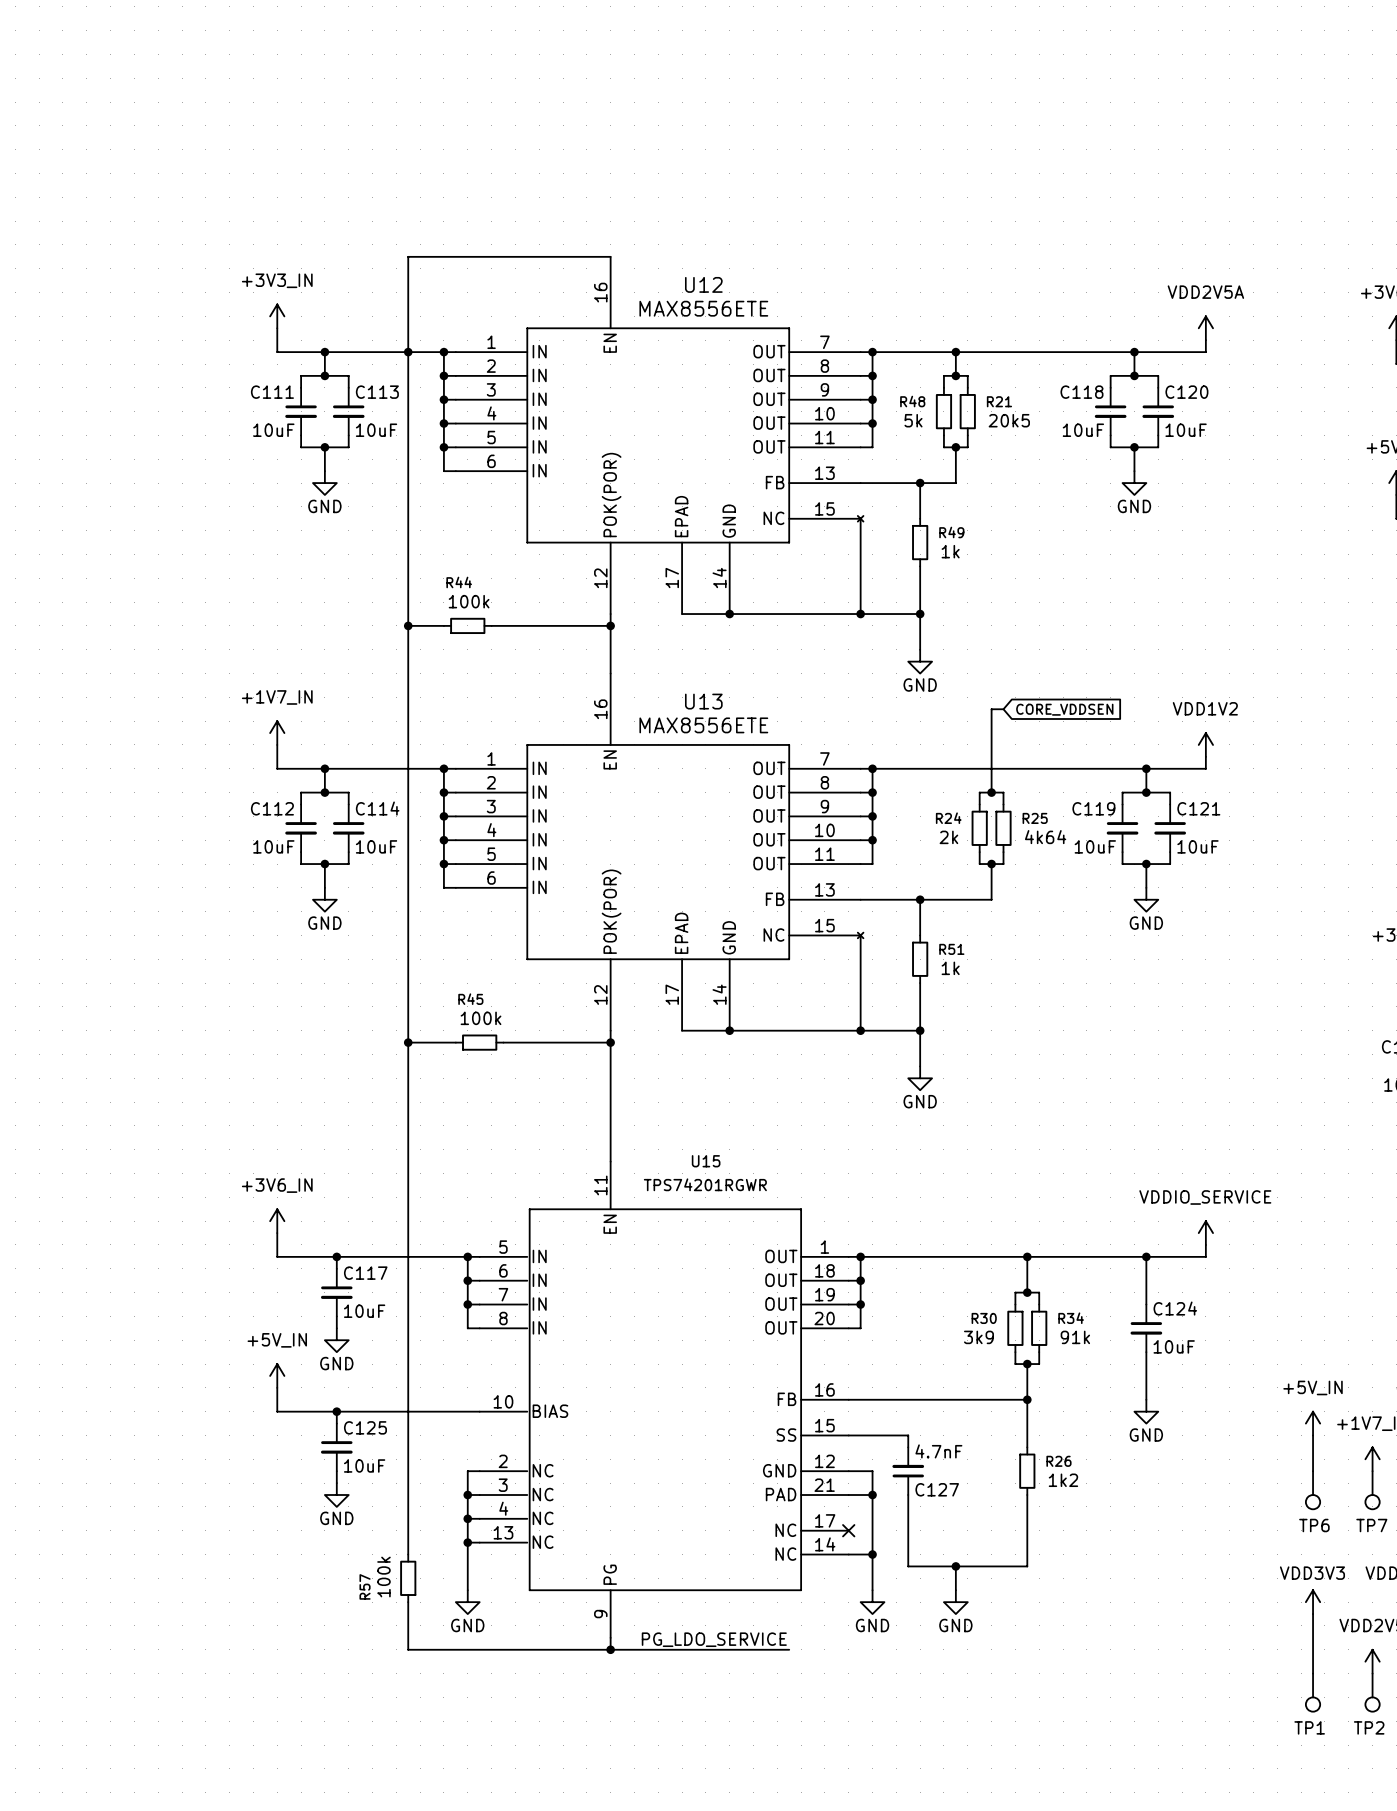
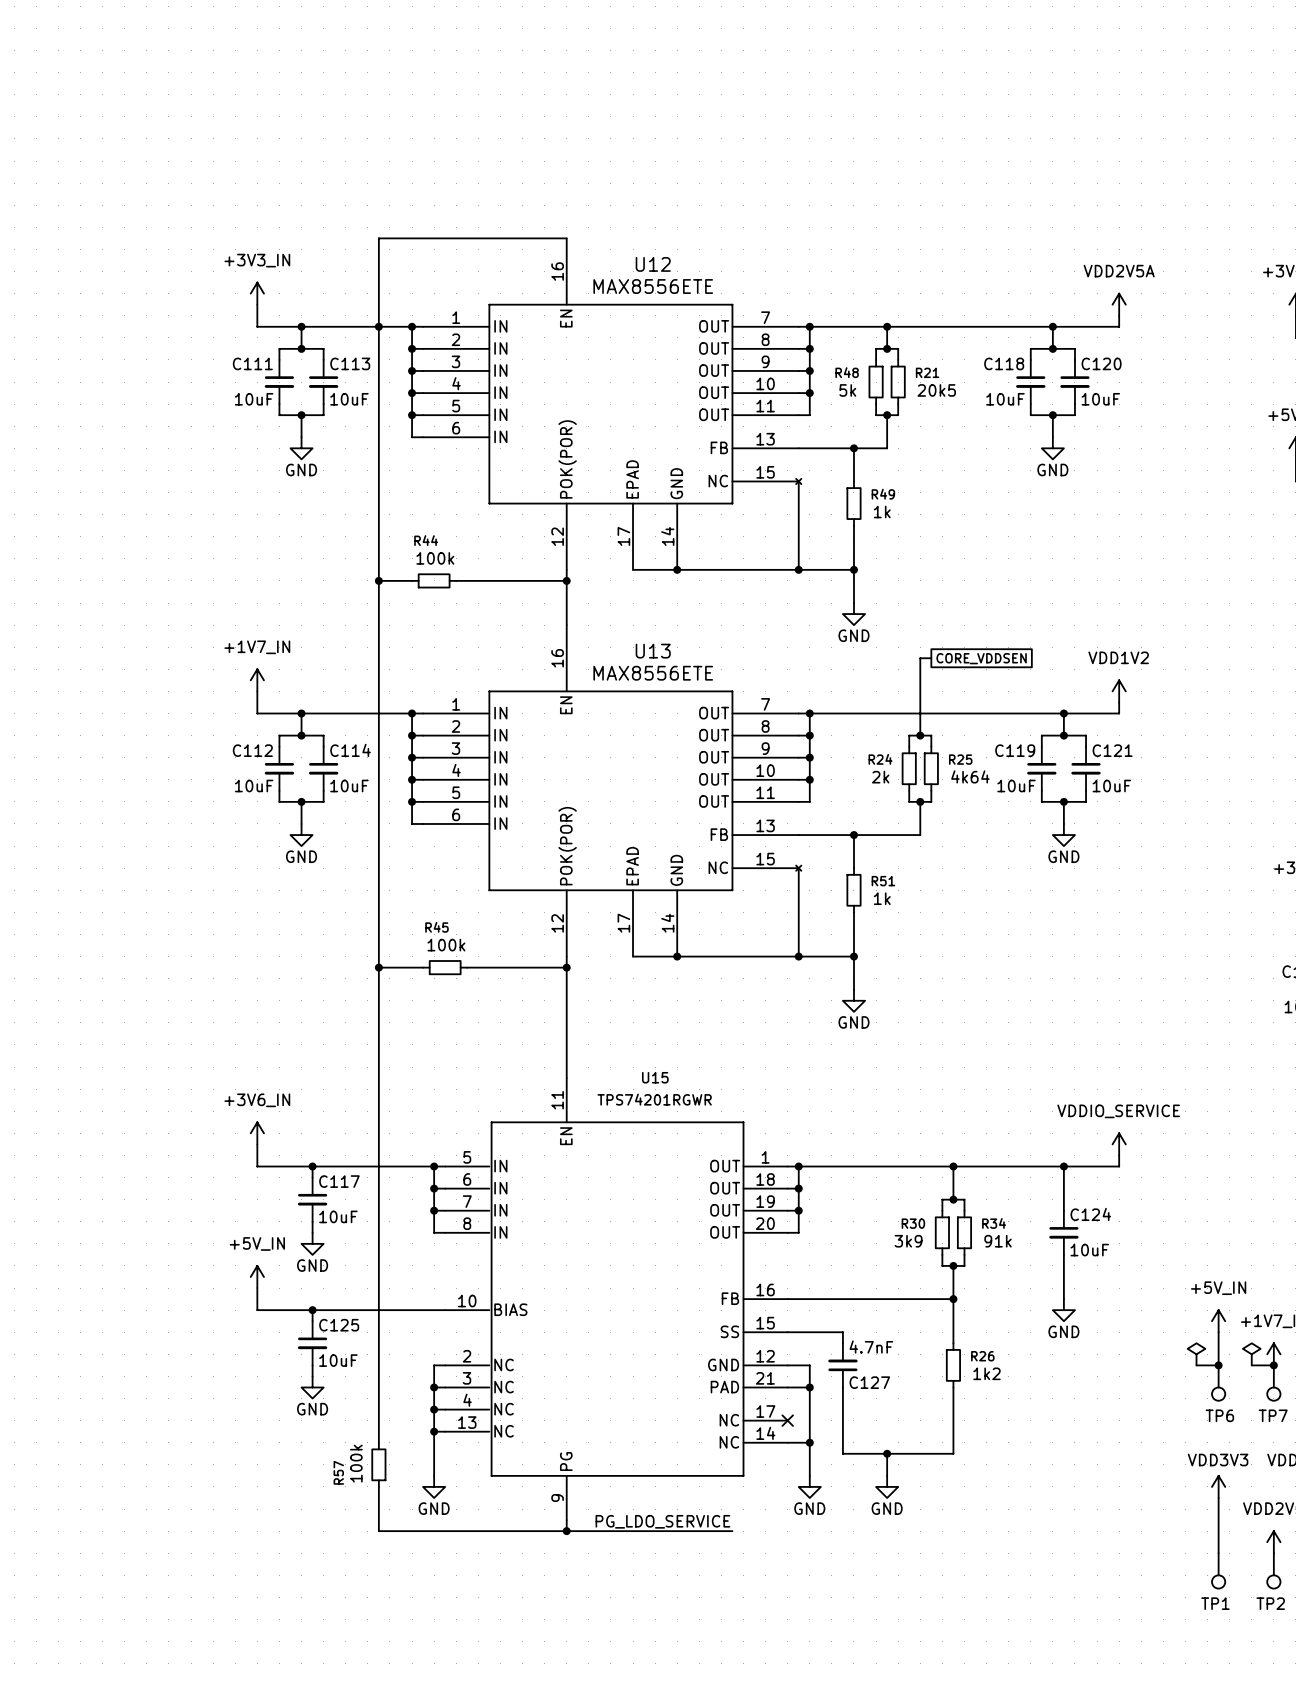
global label shape: input (1064, 709) -> passive (981, 658)
power symbol: none -> (1196, 1354)
power symbol: none -> (1251, 1354)
wire: none -> (1196, 1365) (1218, 1365)
junction: none -> (1218, 1365)
wire: none -> (1251, 1365) (1273, 1365)
junction: none -> (1273, 1365)

